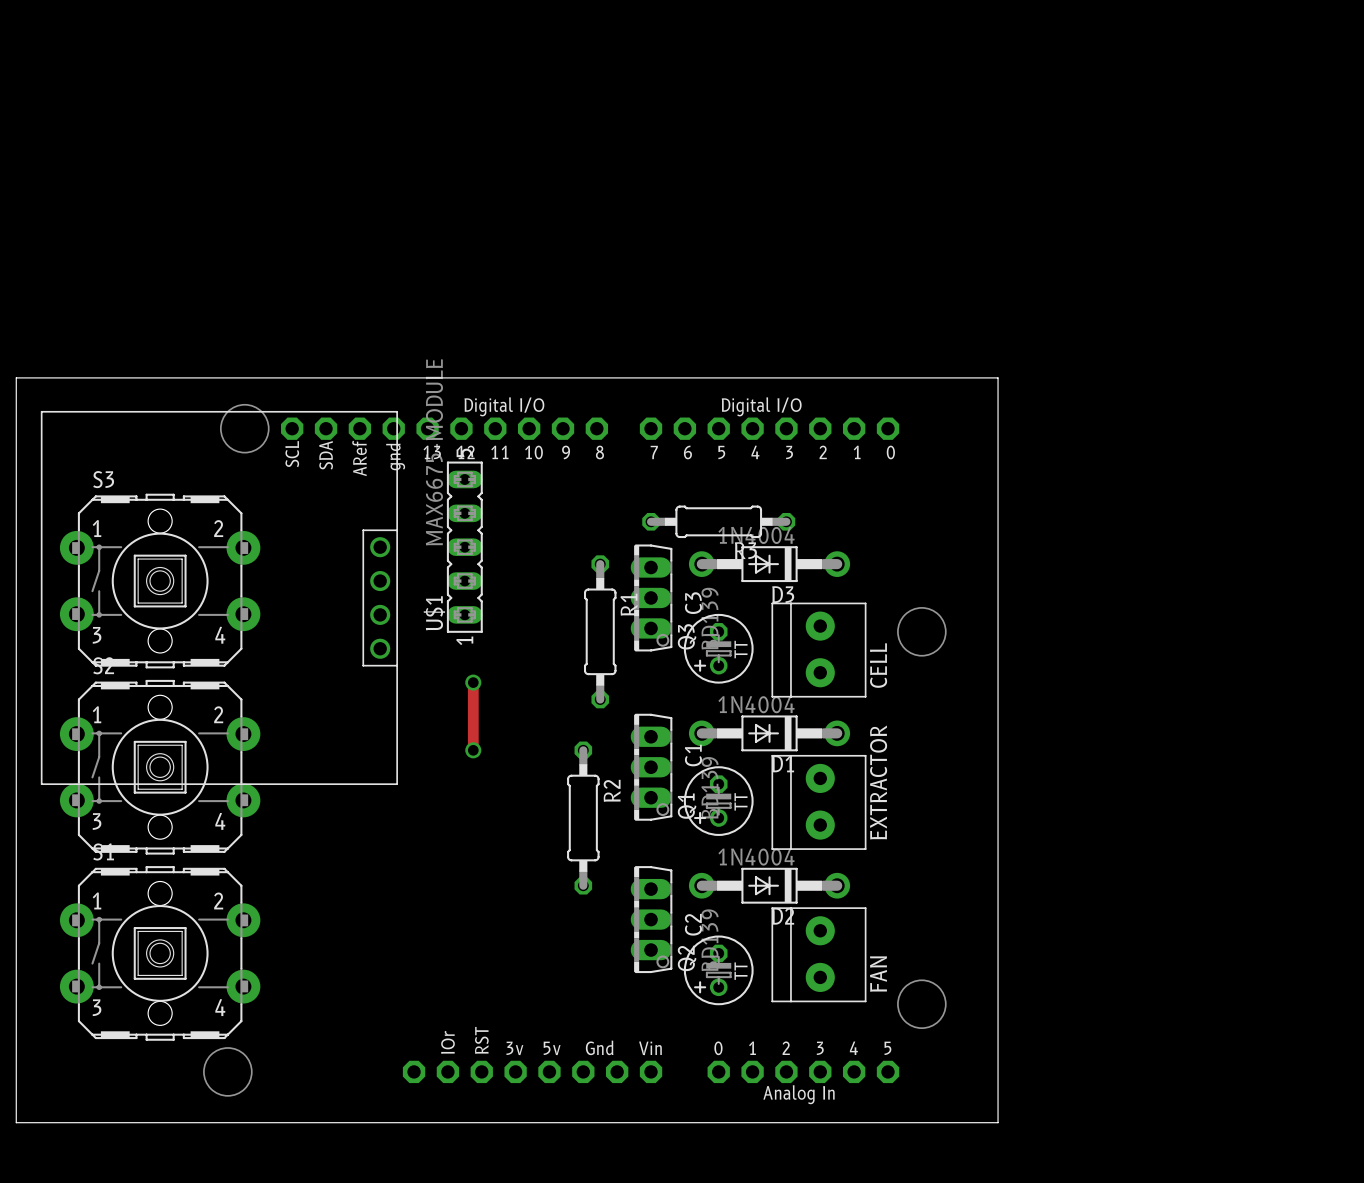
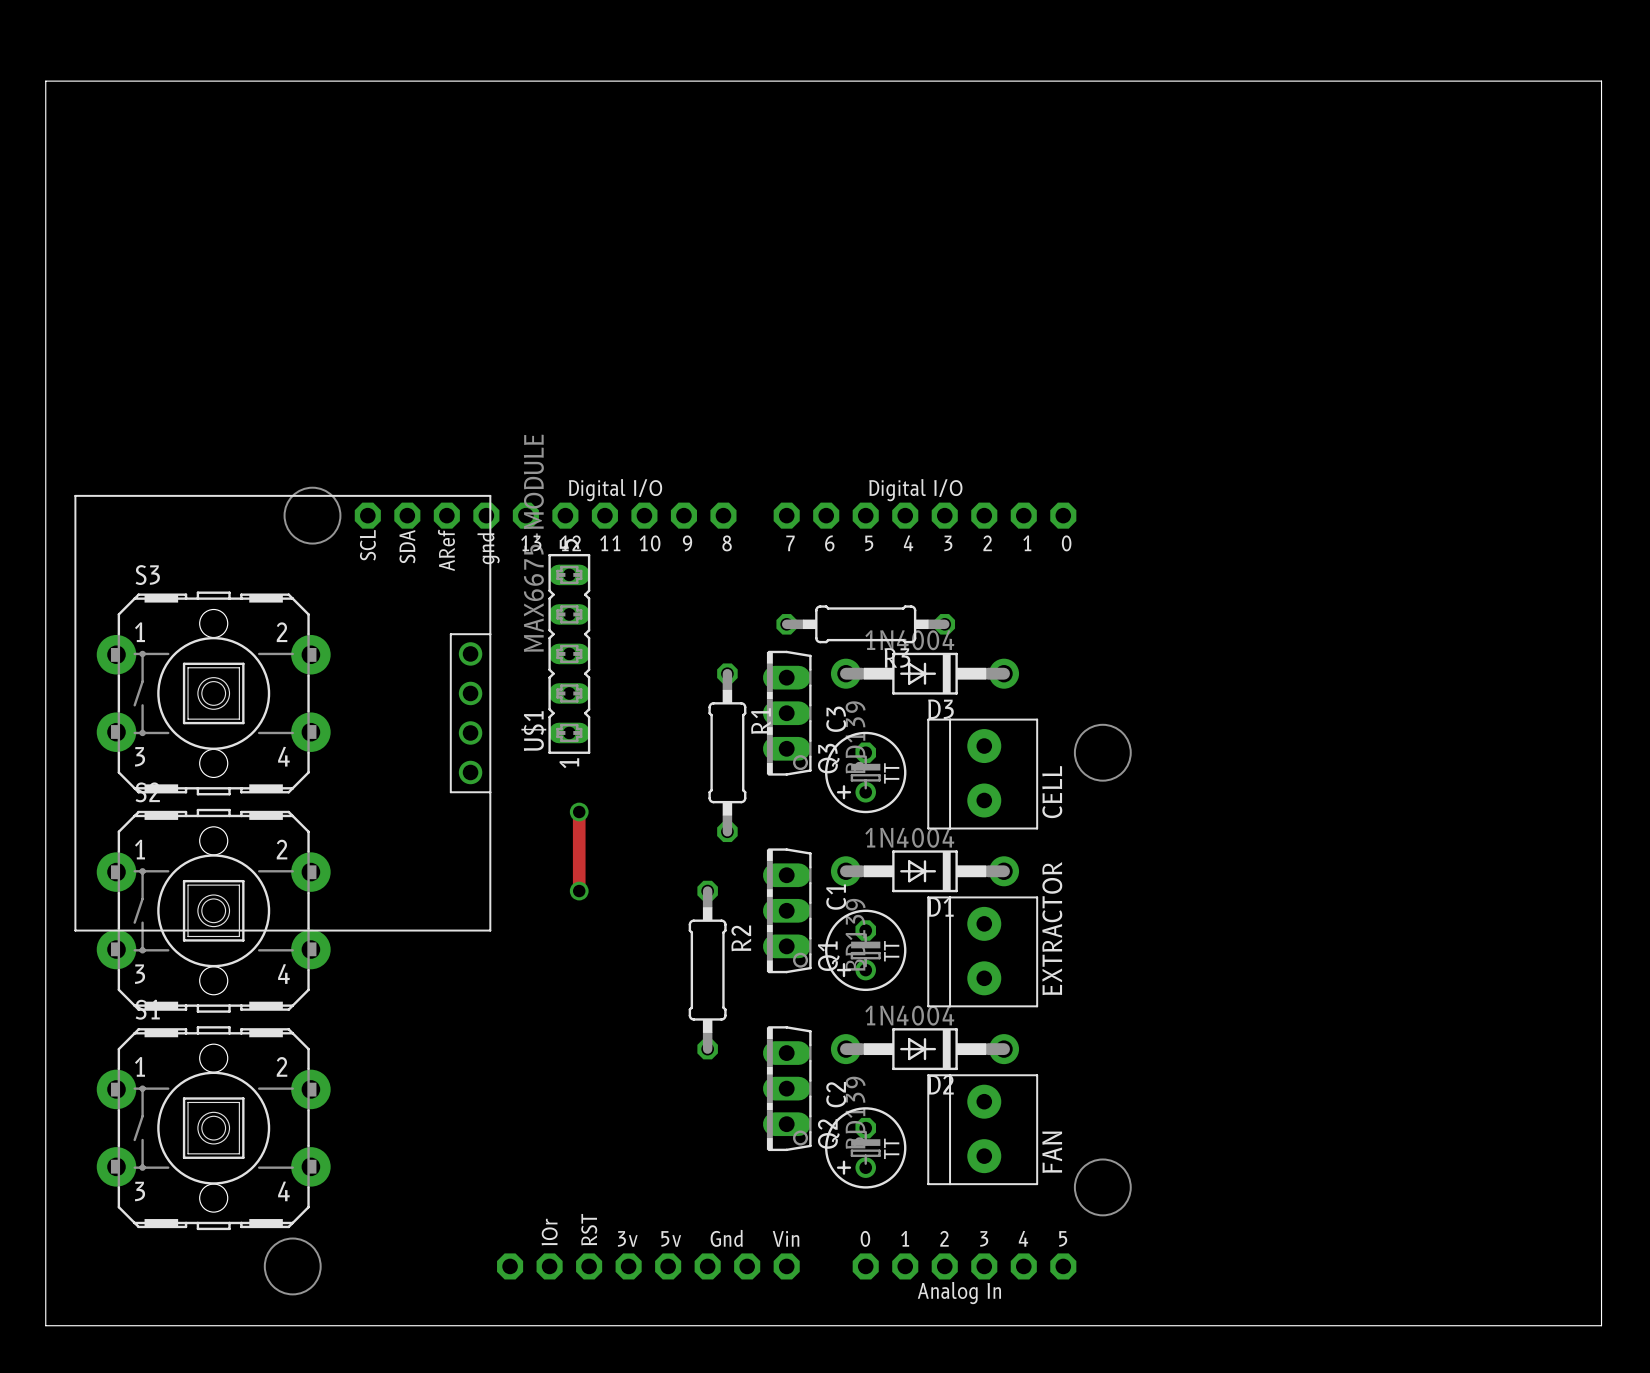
board edge: (16, 377) (998, 377) (998, 1122) -> (45, 456) (45, 81) (1601, 81) (1601, 1325) (1191, 1325)

